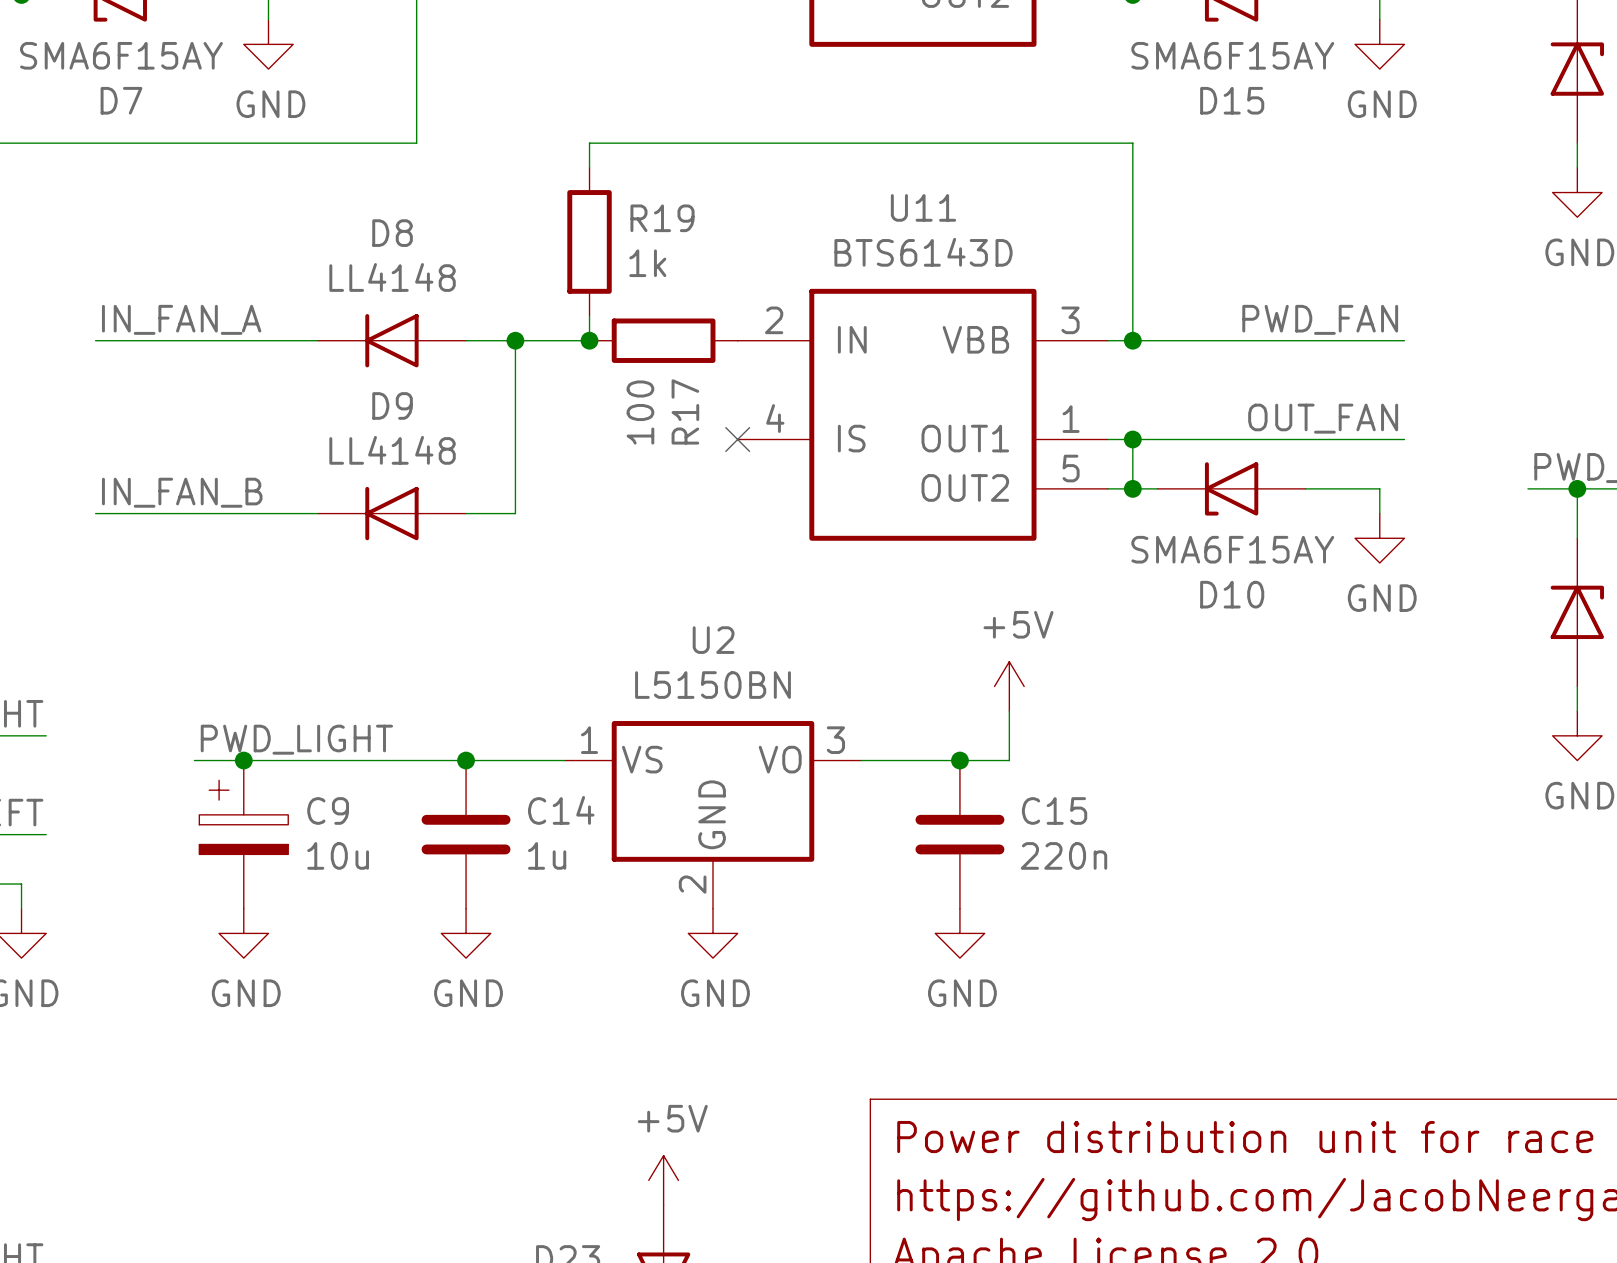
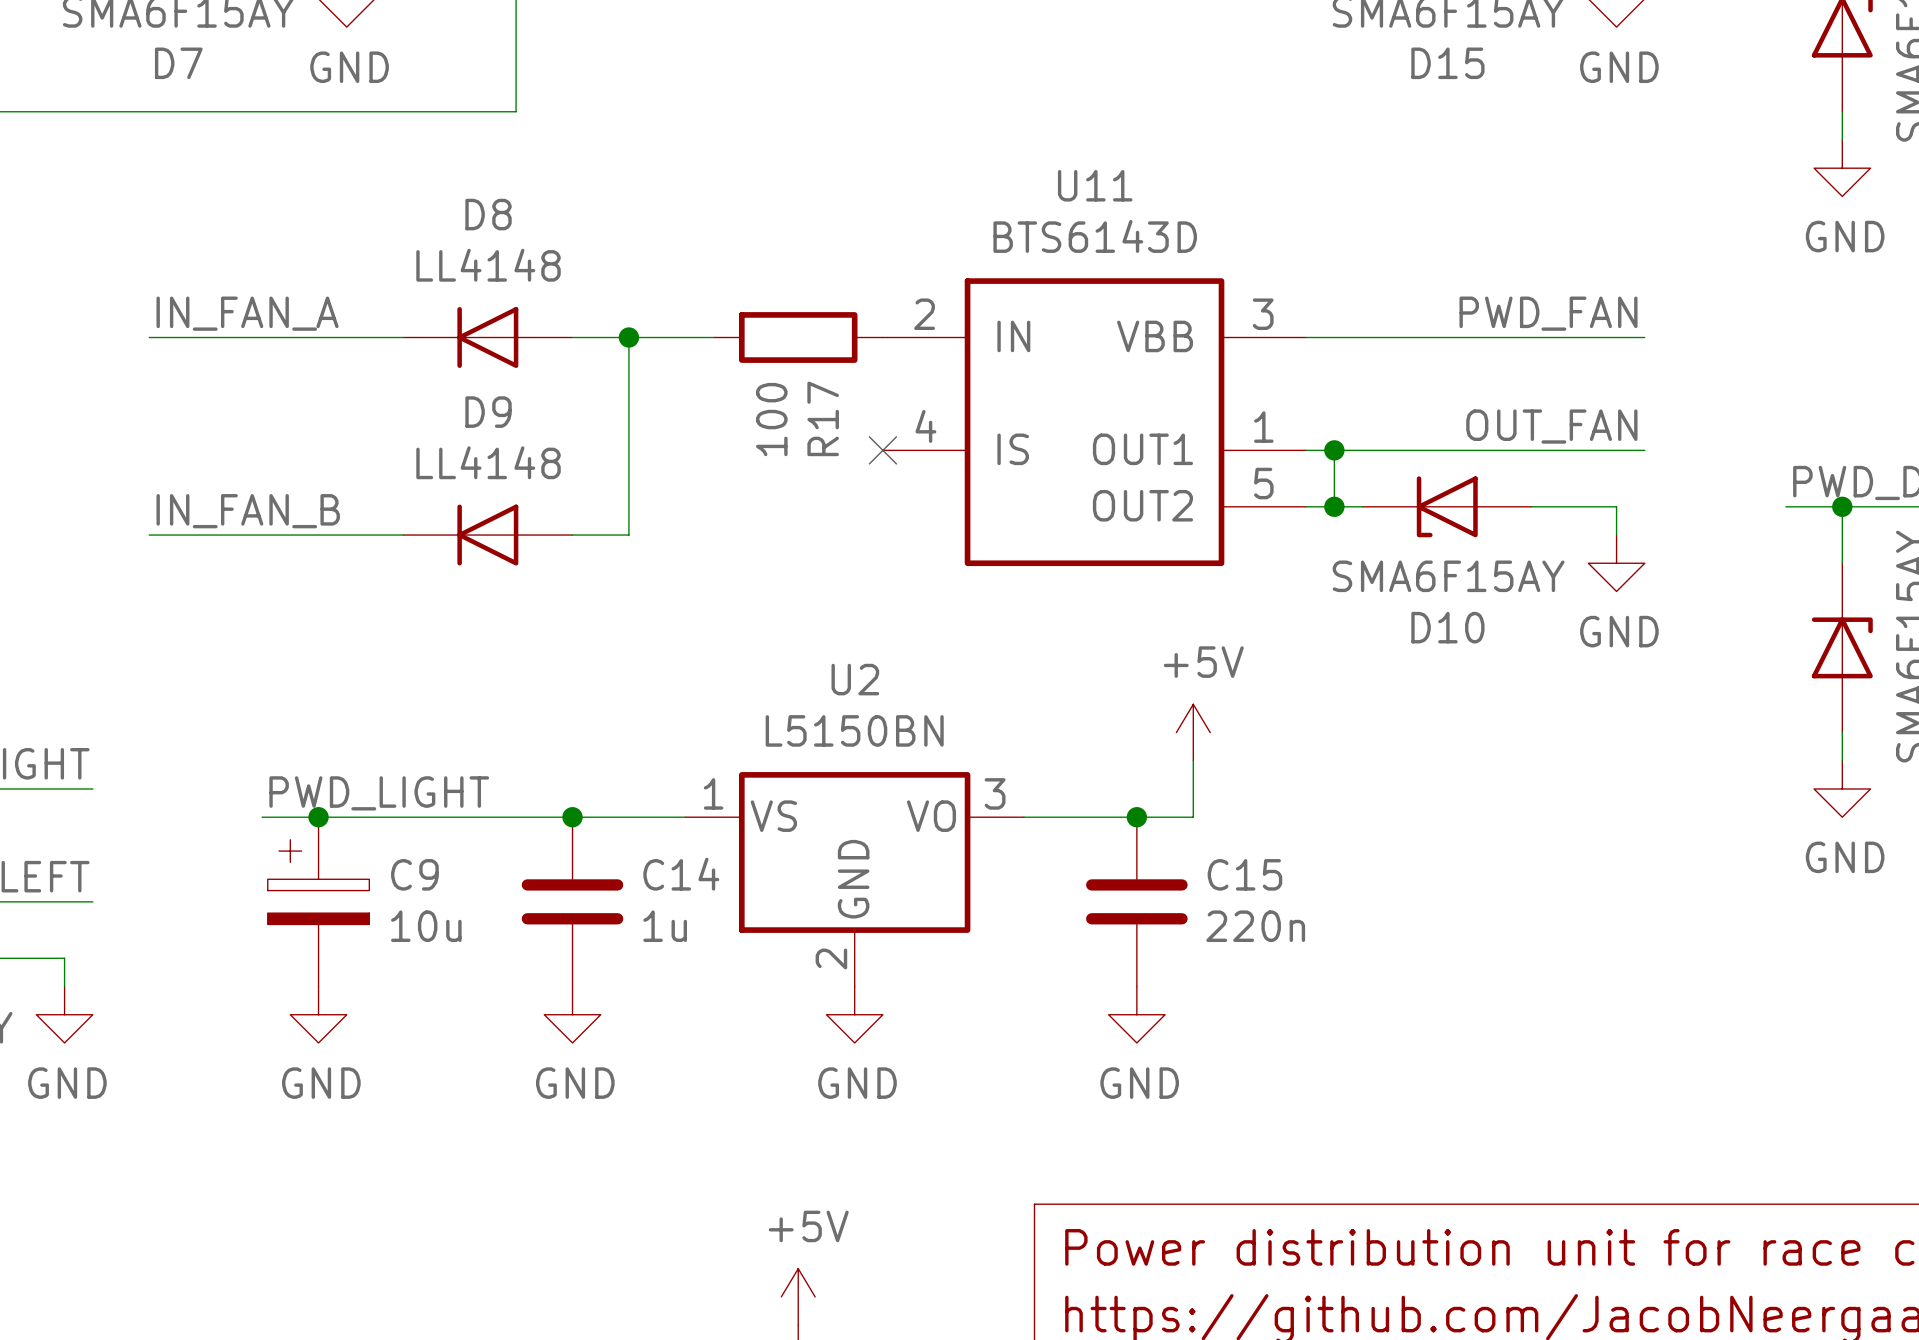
wire: (589, 167) (589, 143) (1132, 143) (1132, 340) -> none
R19: 1k (589, 241) -> none
wire: (589, 316) (589, 340) -> none
junction: (589, 340) -> none
junction: (1132, 340) -> none

